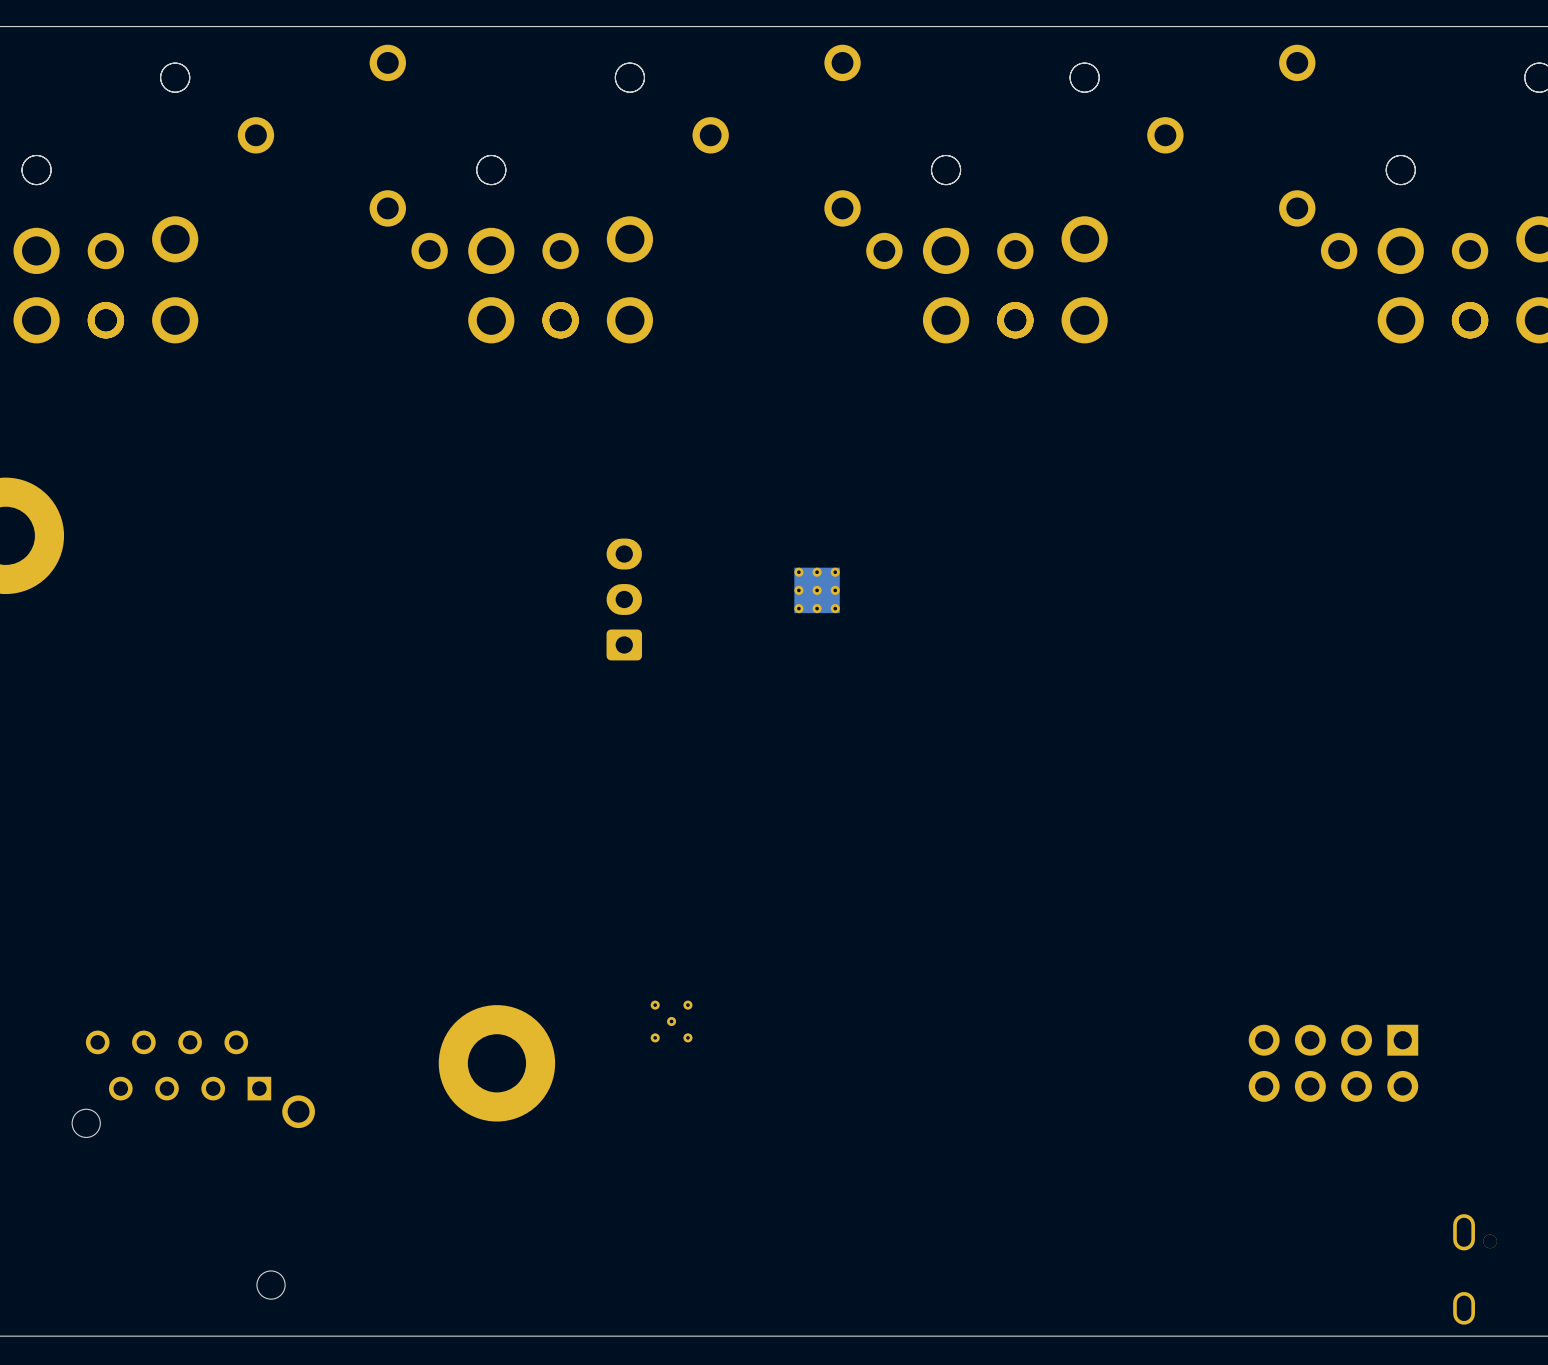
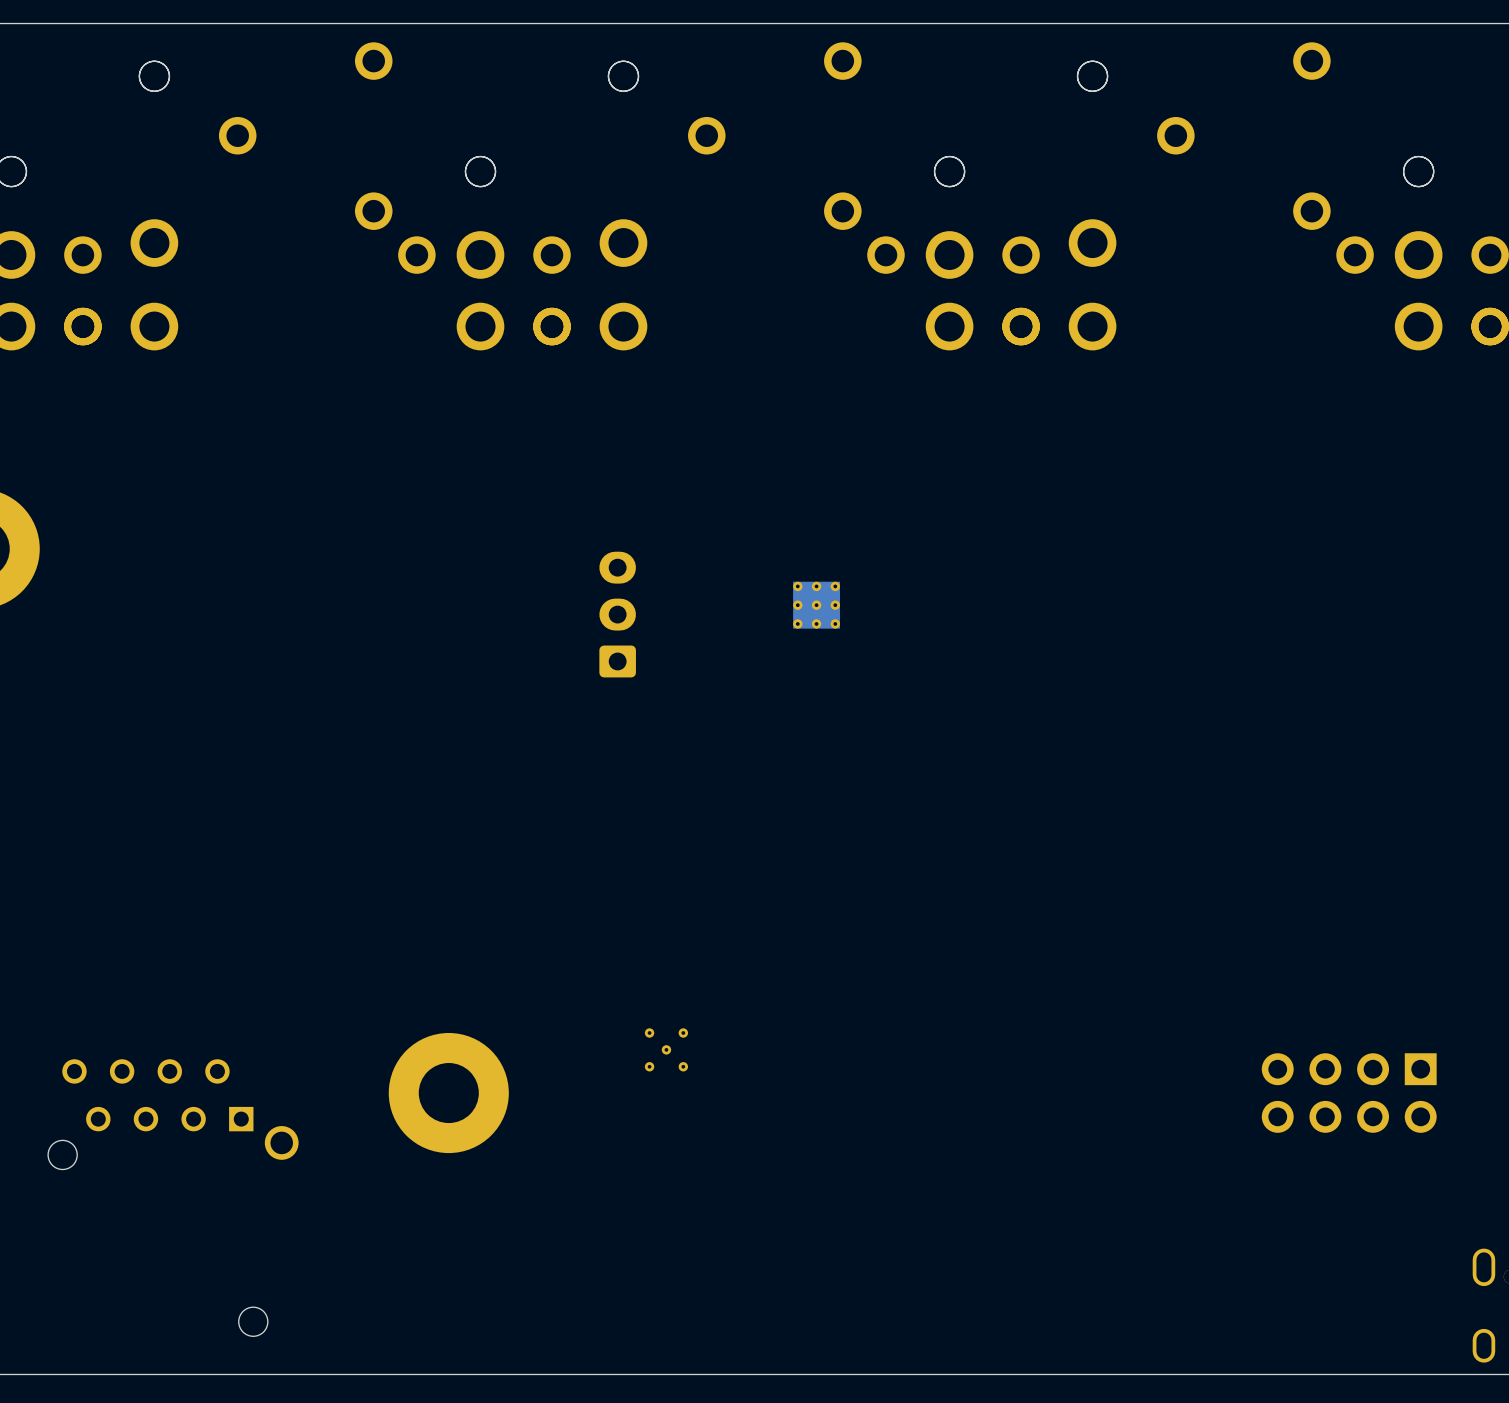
part position: (496, 1063) -> (448, 1093)

